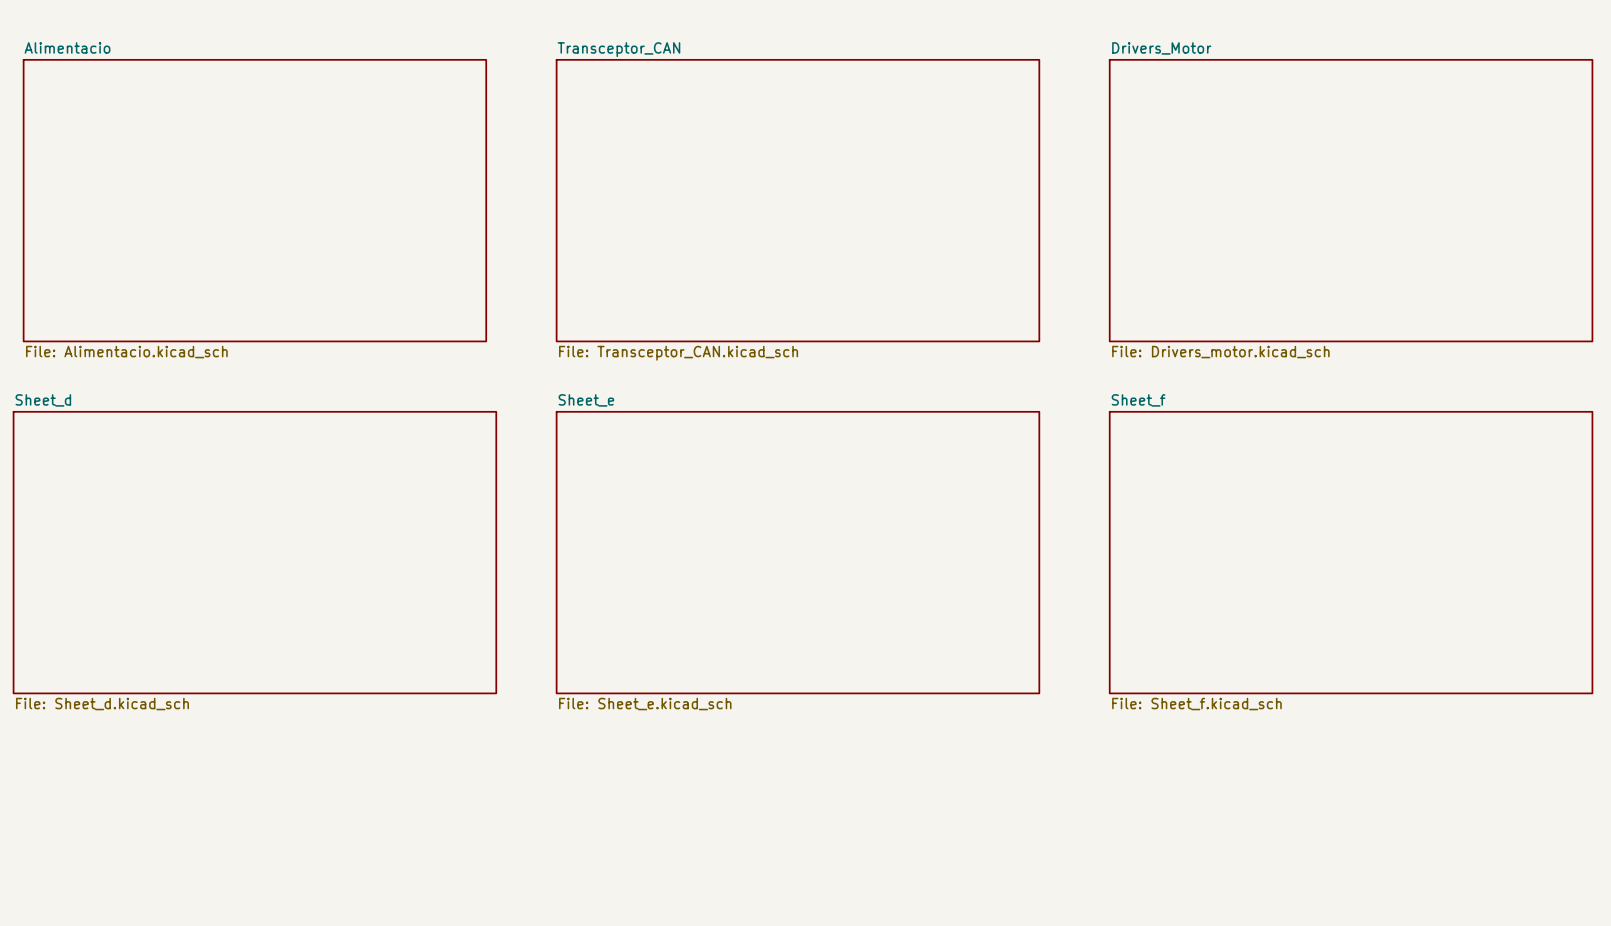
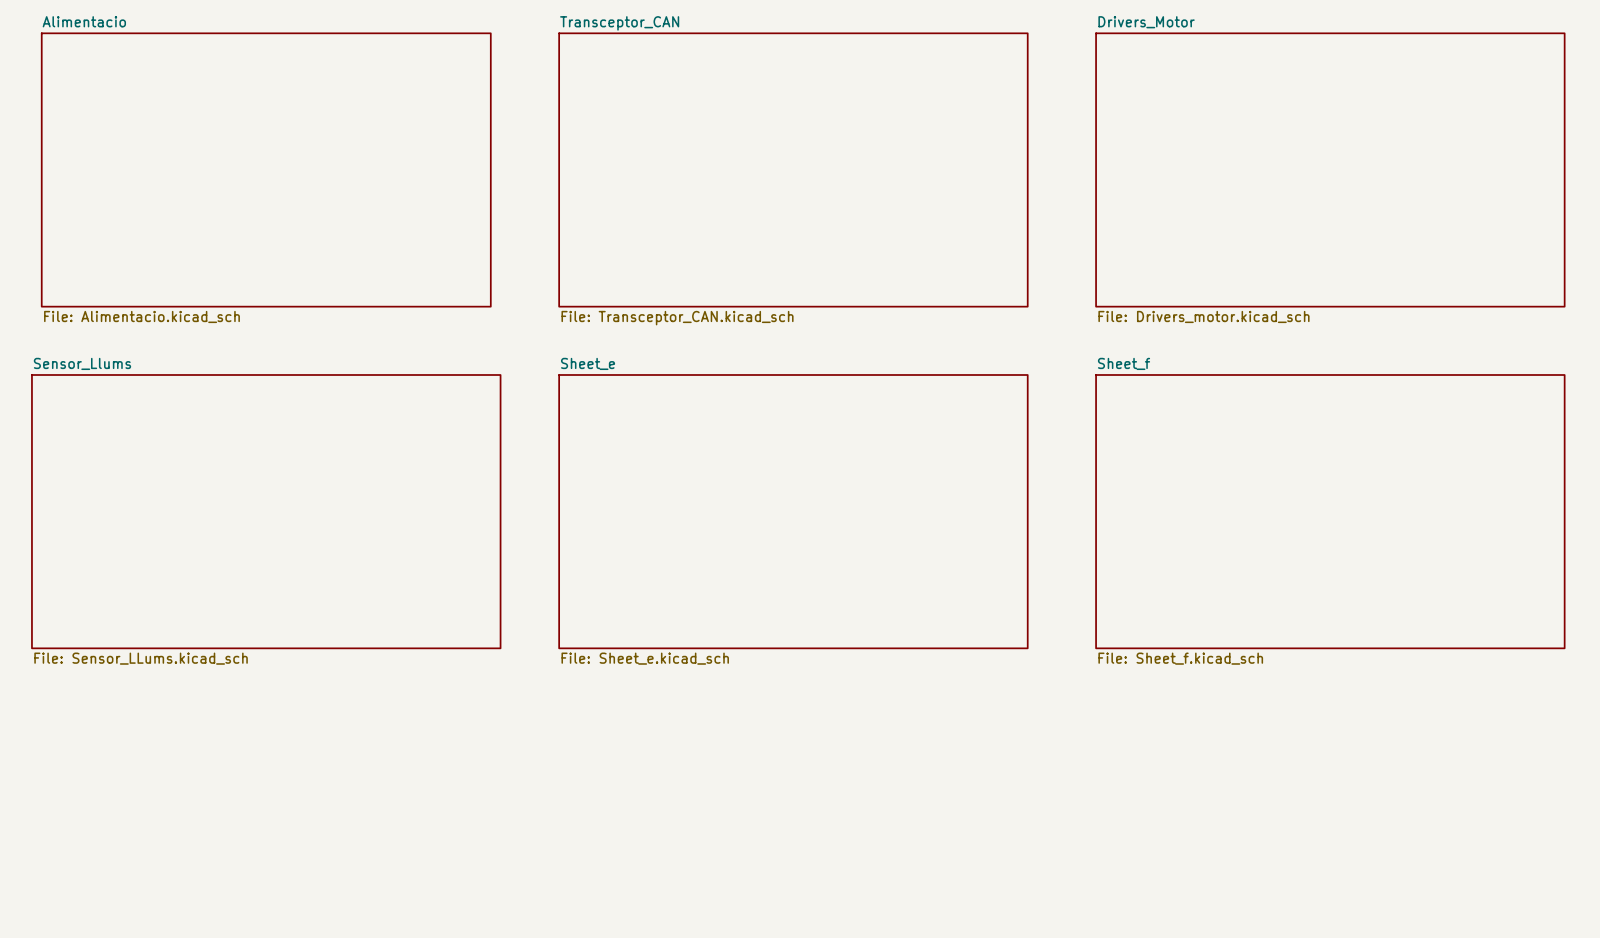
sheet Sheet_d name: Sheet_d (43, 400) -> Sensor_Llums (82, 363)
sheet Sheet_d value: File: Sheet_d.kicad_sch (102, 704) -> File: Sensor_LLums.kicad_sch (141, 658)

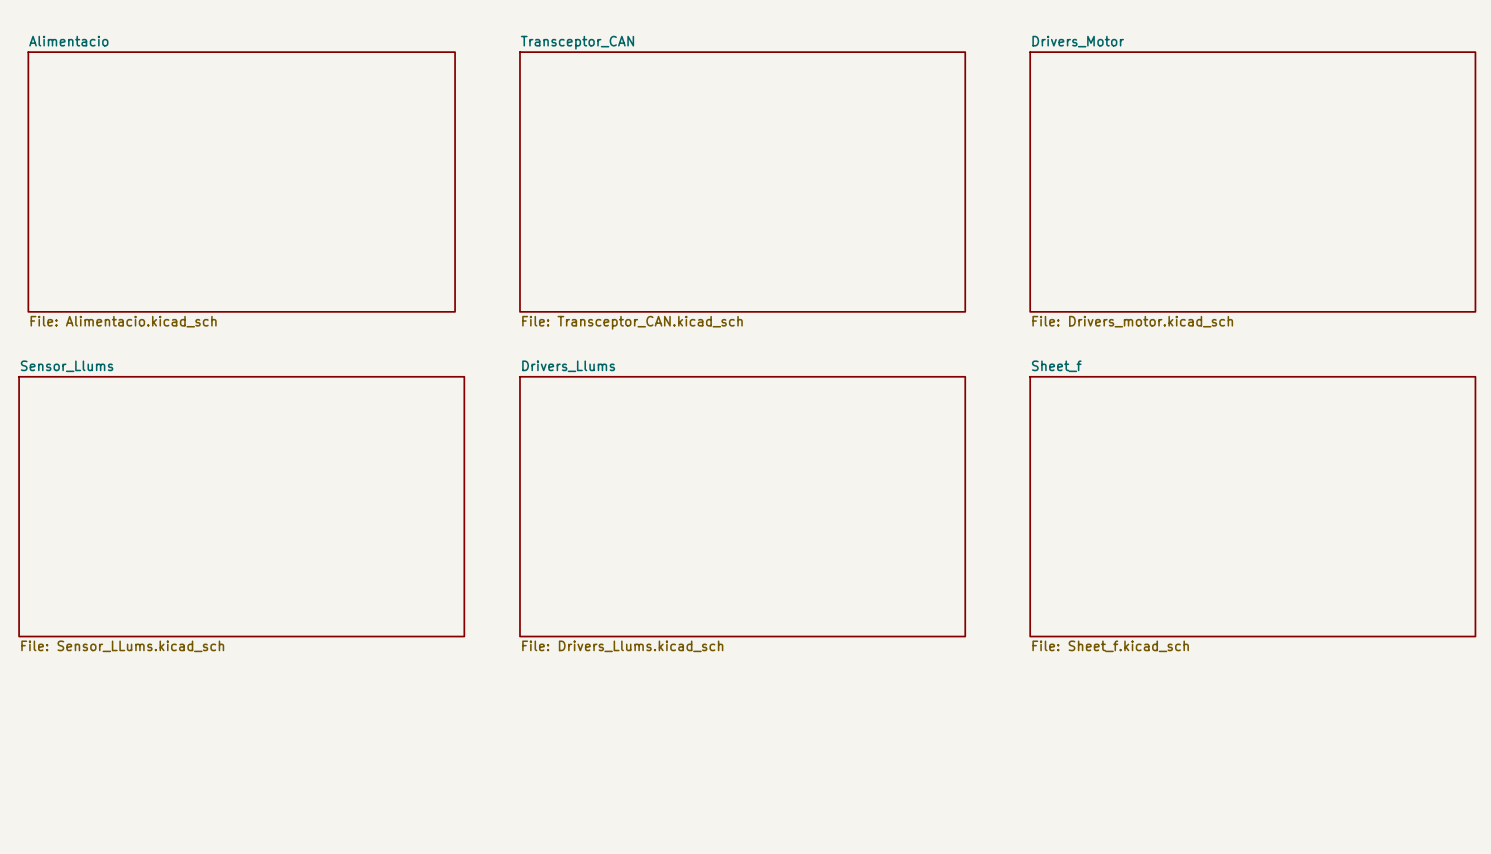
sheet Sheet_e name: Sheet_e (588, 363) -> Drivers_Llums (568, 366)
sheet Sheet_e value: File: Sheet_e.kicad_sch (645, 658) -> File: Drivers_Llums.kicad_sch (622, 646)

